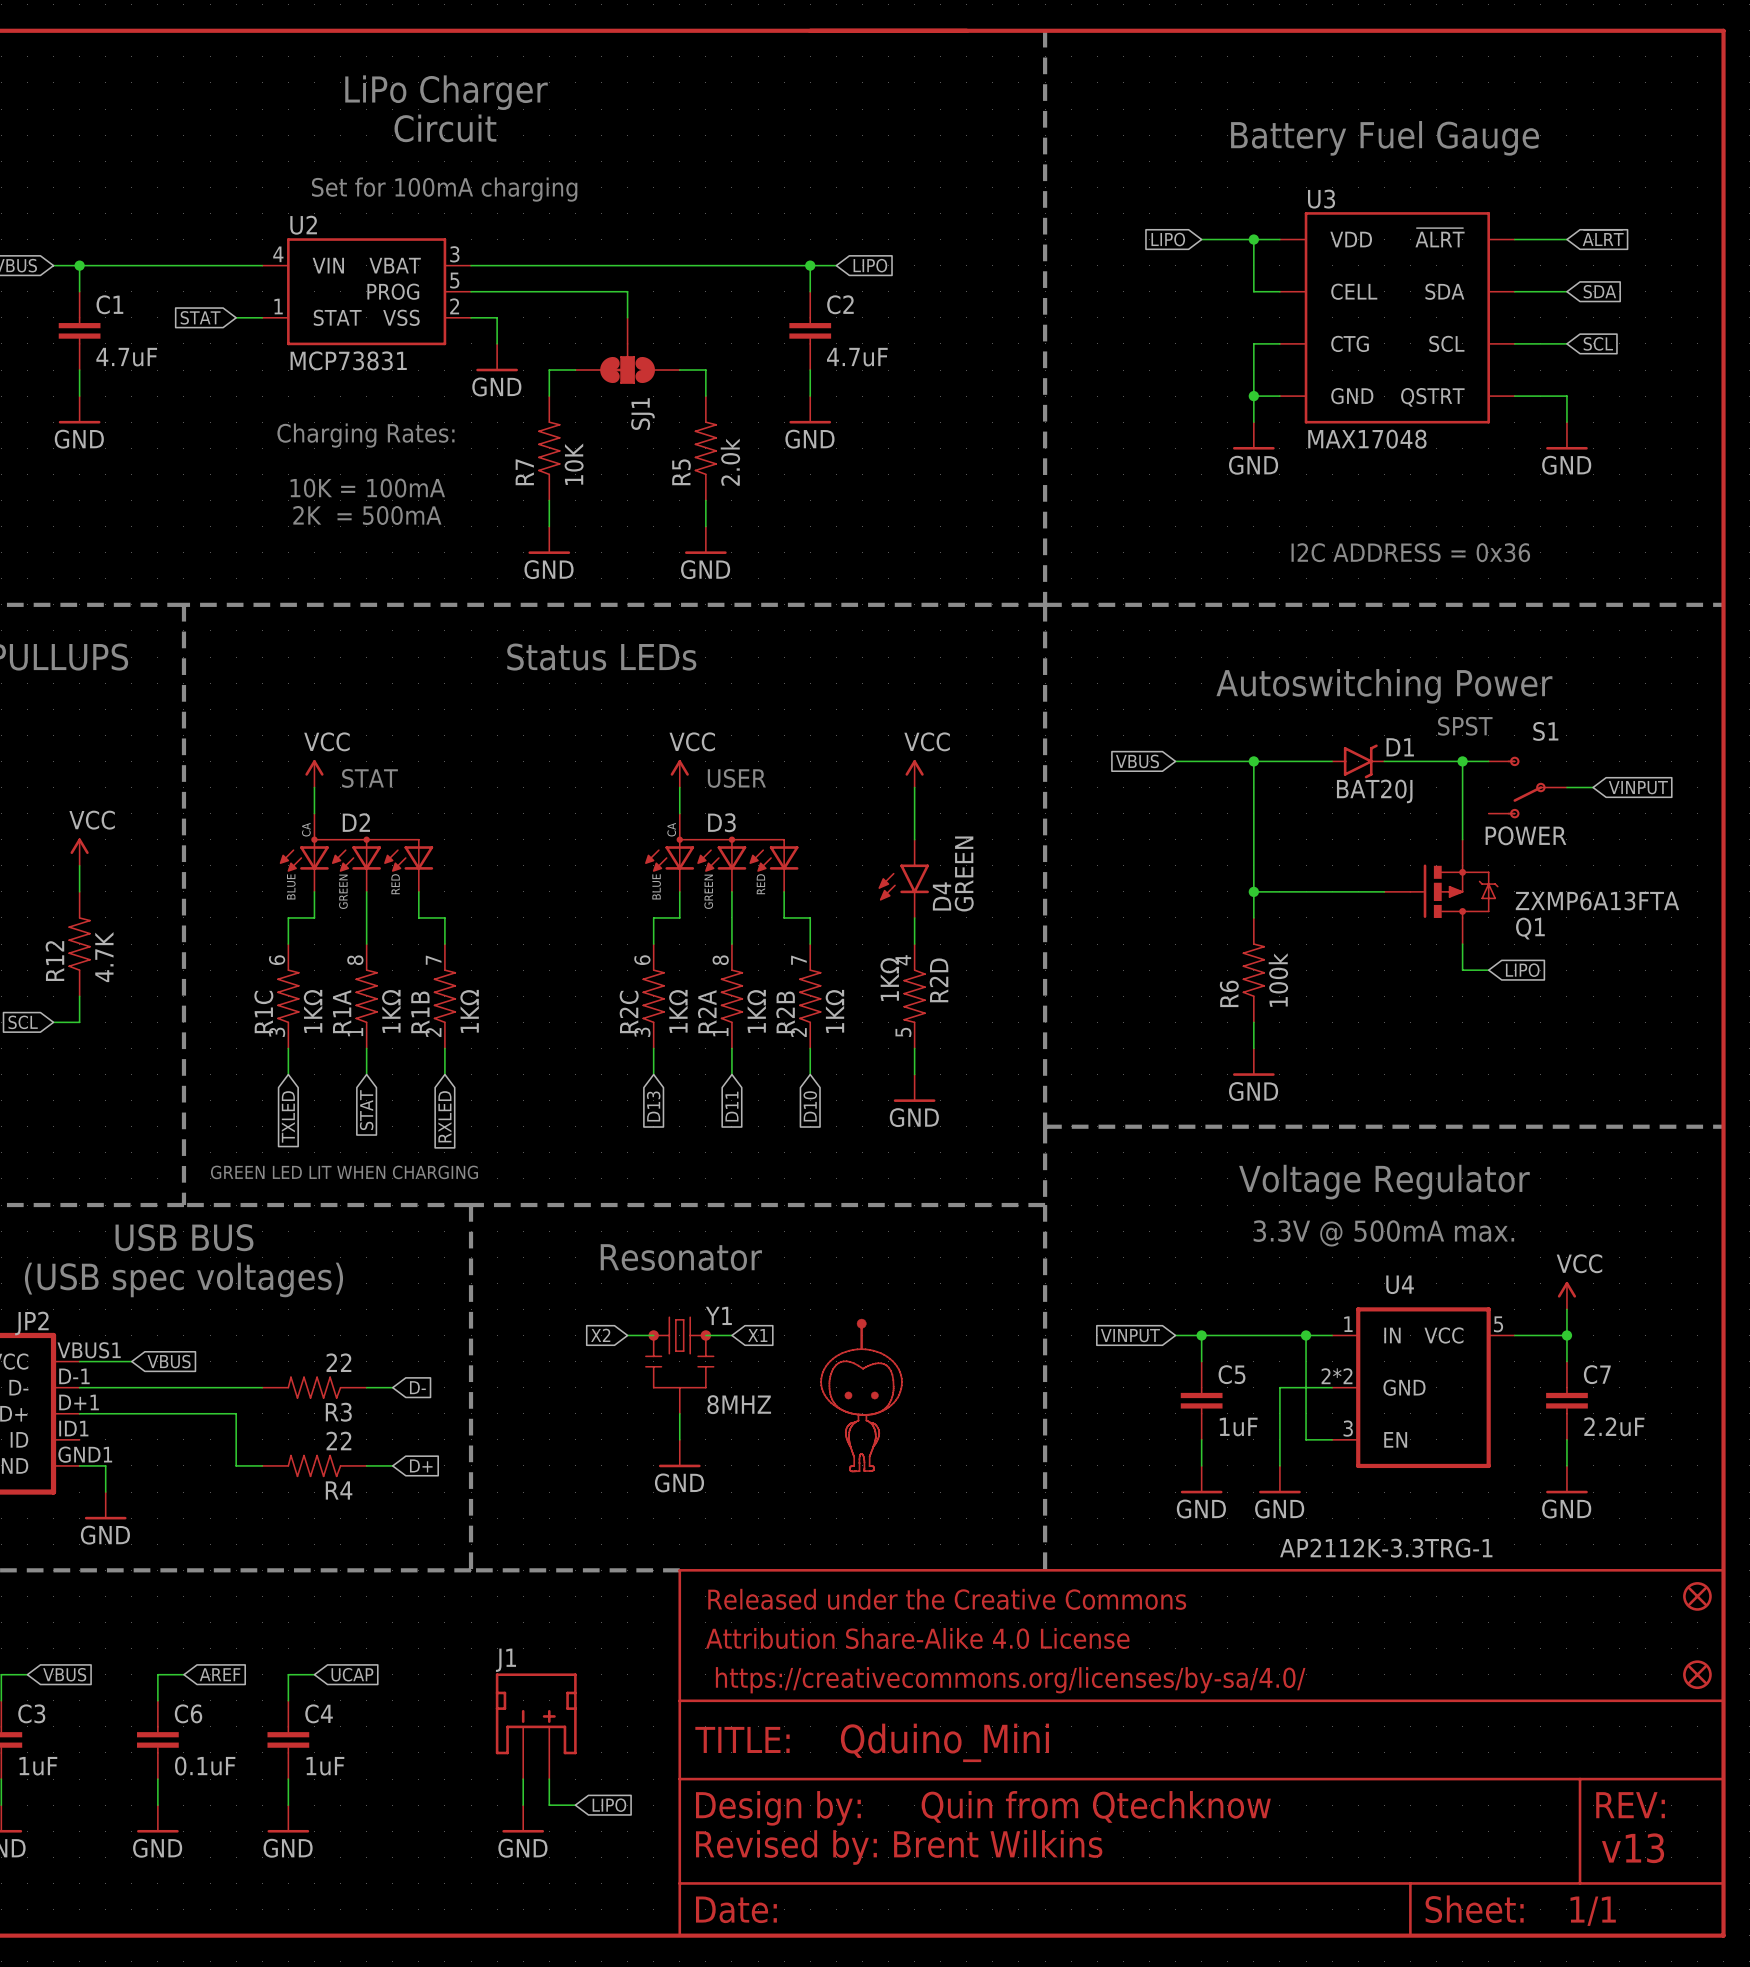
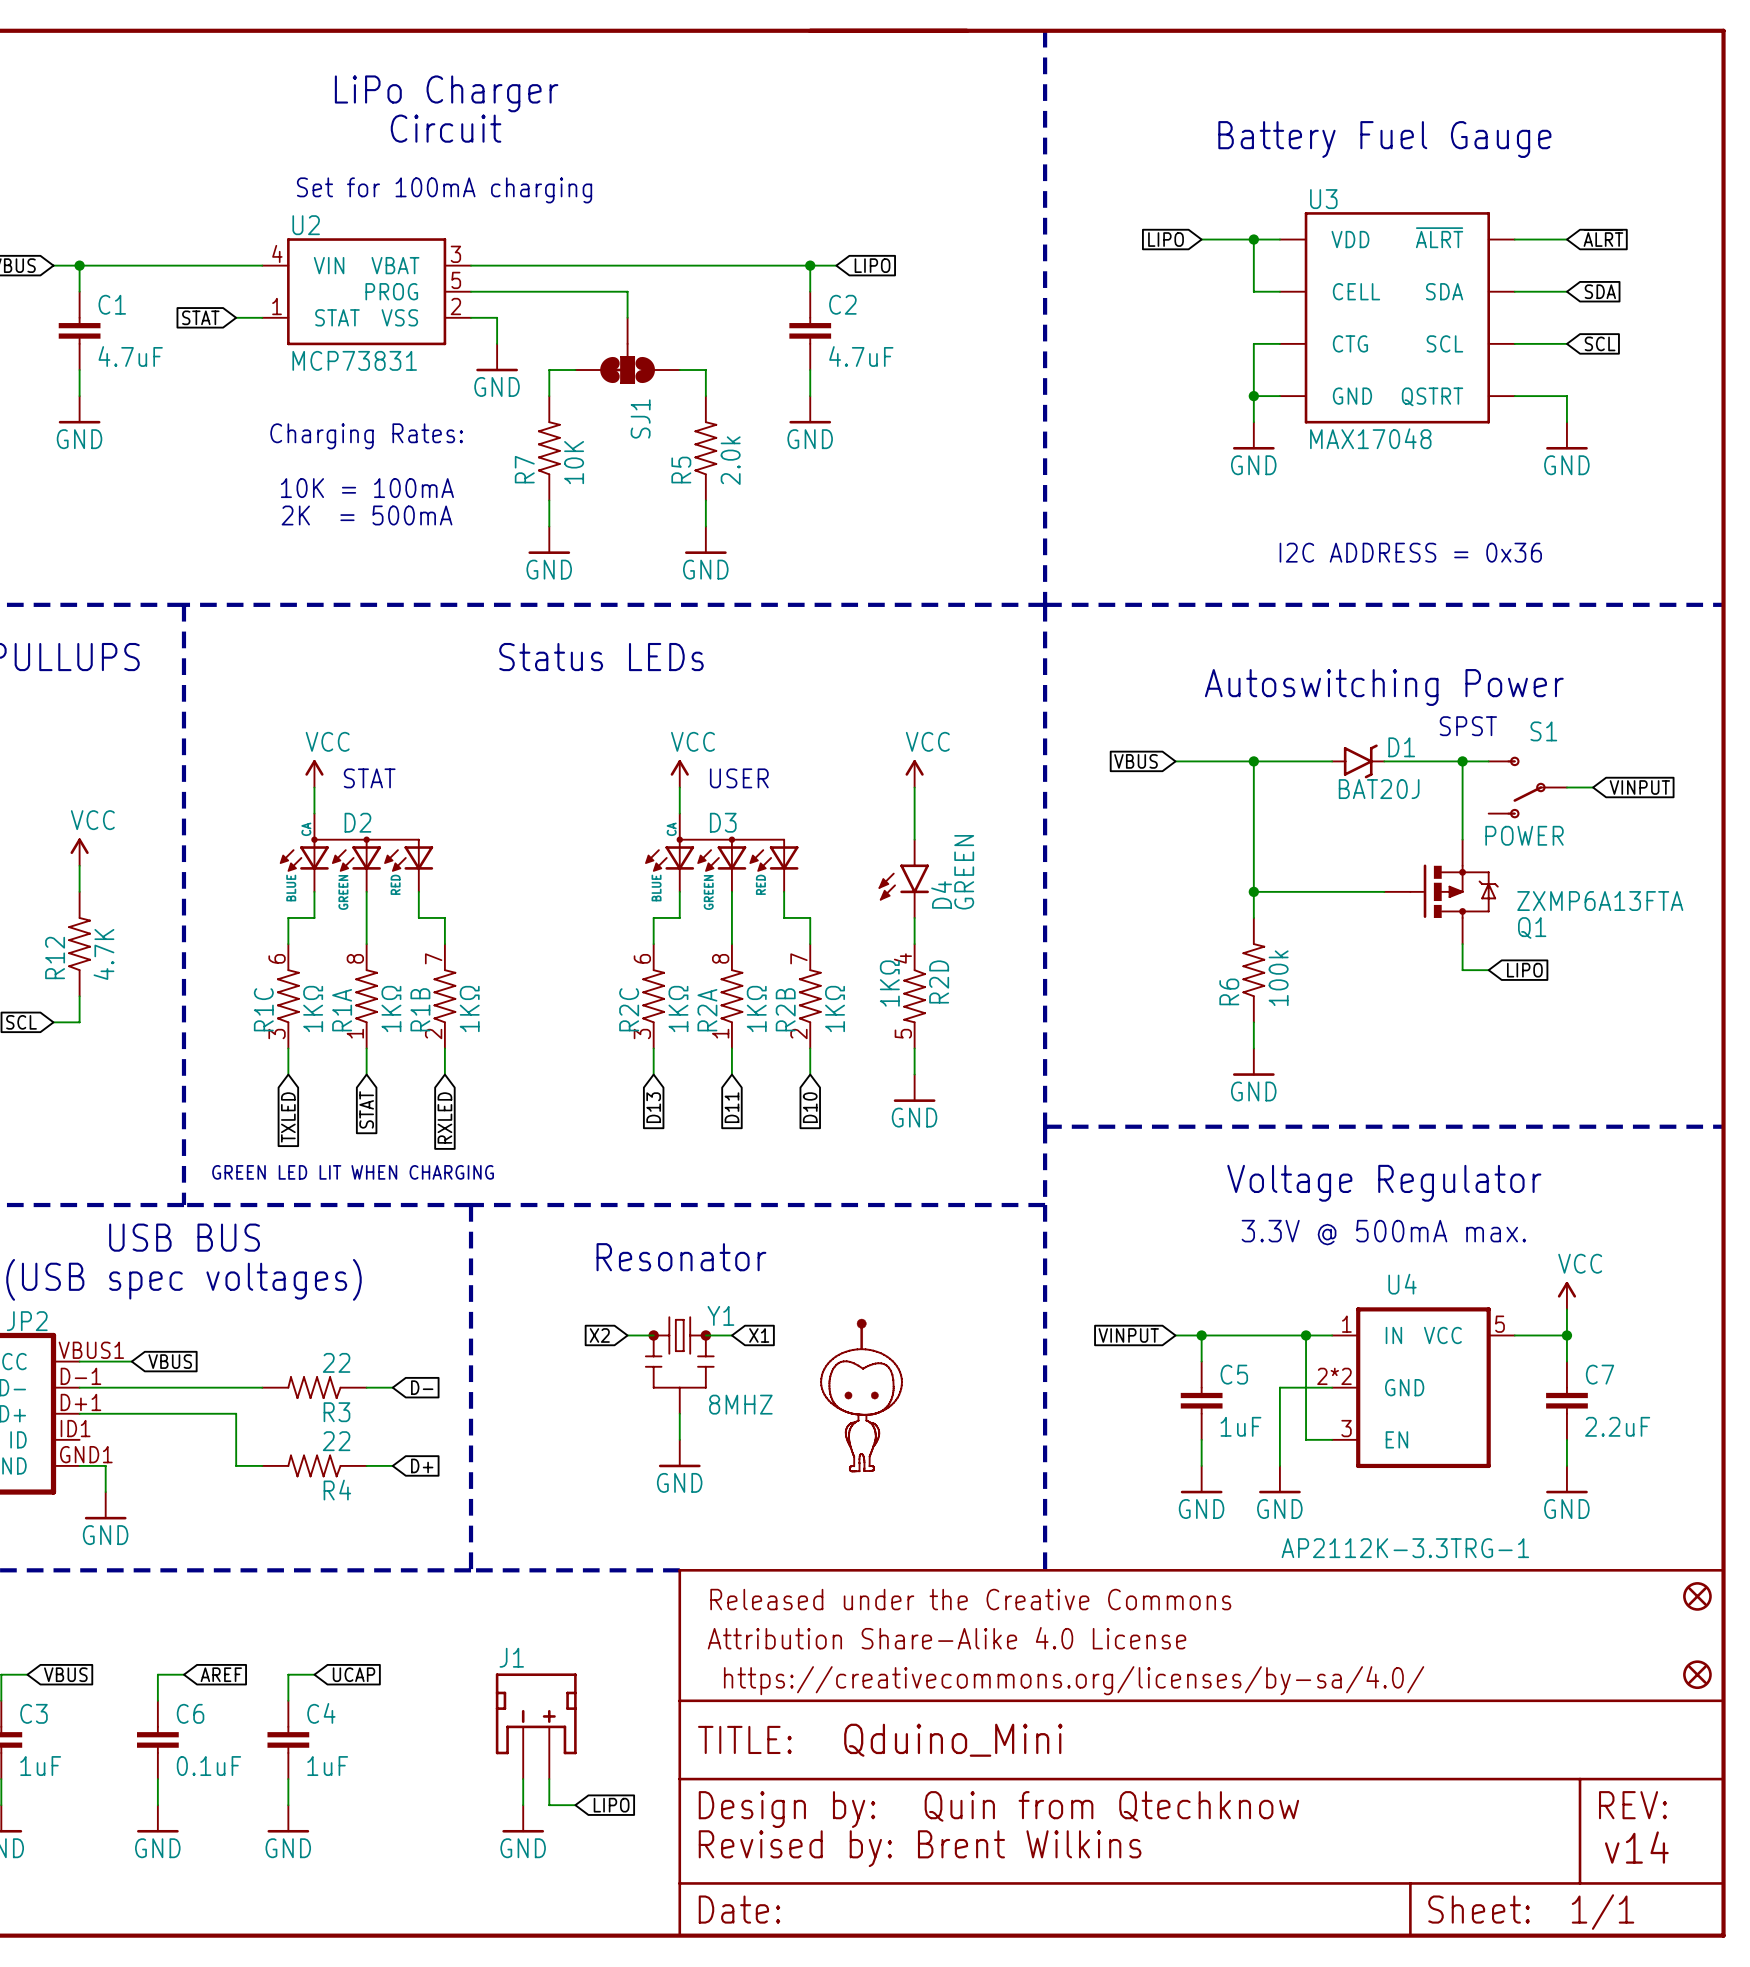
text: v13 (1633, 1848) -> v14 (1636, 1847)

